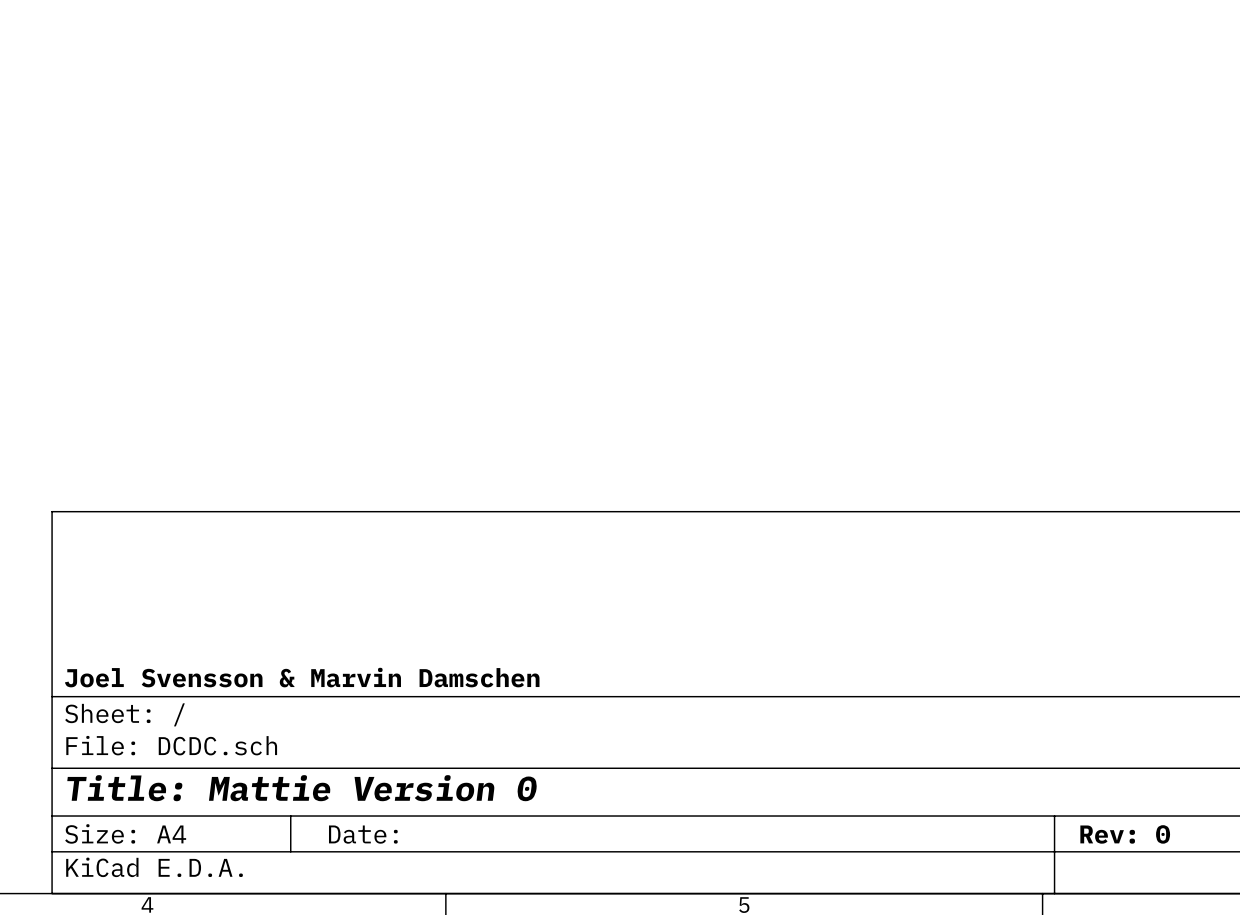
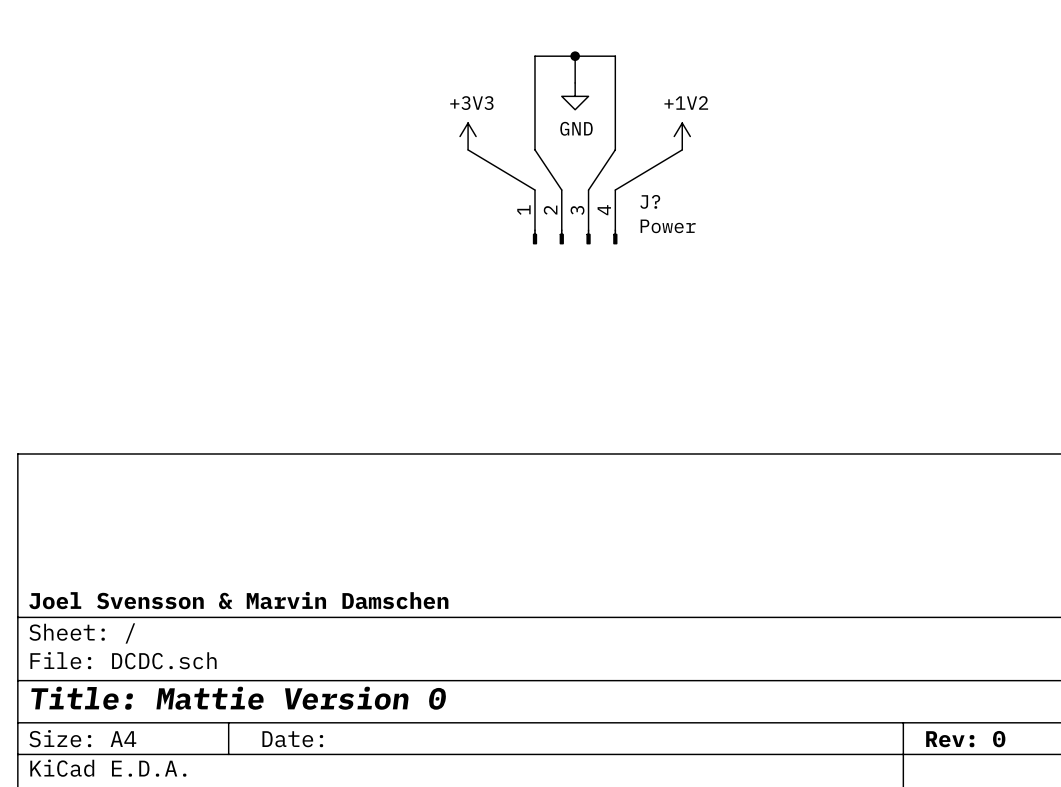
wire: none -> (575, 56) (575, 82)
junction: none -> (575, 56)
power symbol: none -> GND (575, 96)
power symbol: none -> +3V3 (468, 136)
power symbol: none -> +1V2 (682, 136)
wire: none -> (468, 149) (534, 190)
wire: none -> (682, 149) (615, 190)
wire: none -> (561, 190) (534, 149) (534, 56) (615, 56) (615, 149) (588, 190)
J?: none -> Power (575, 217)

